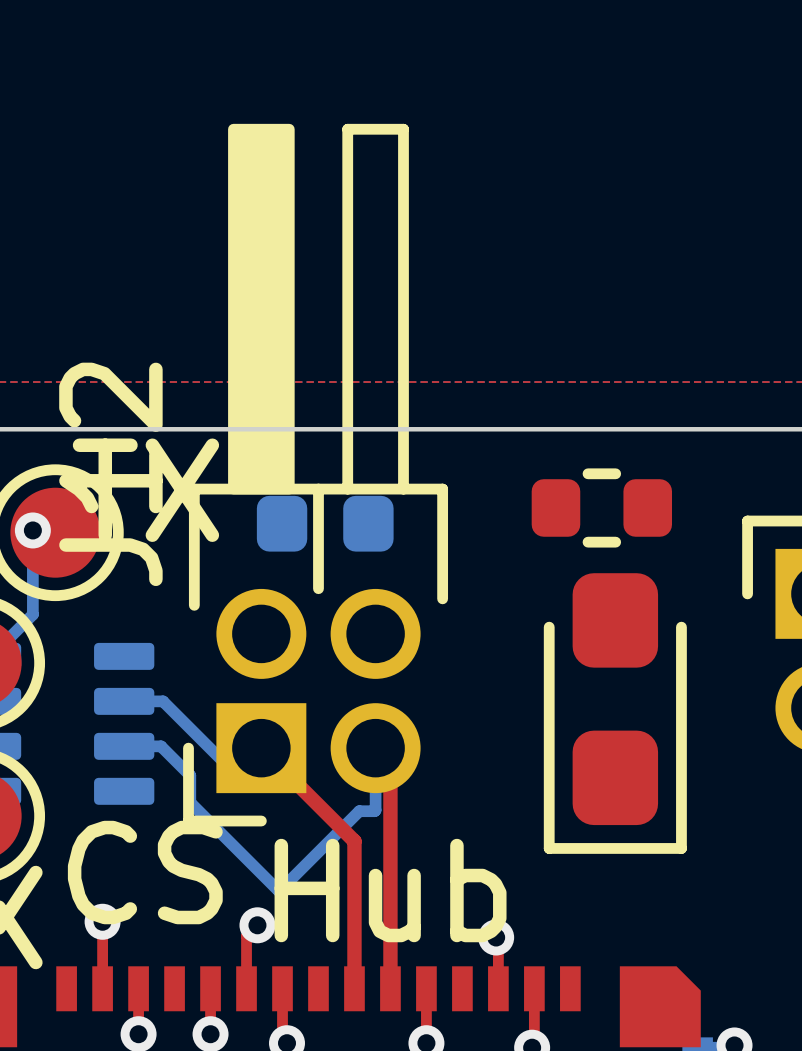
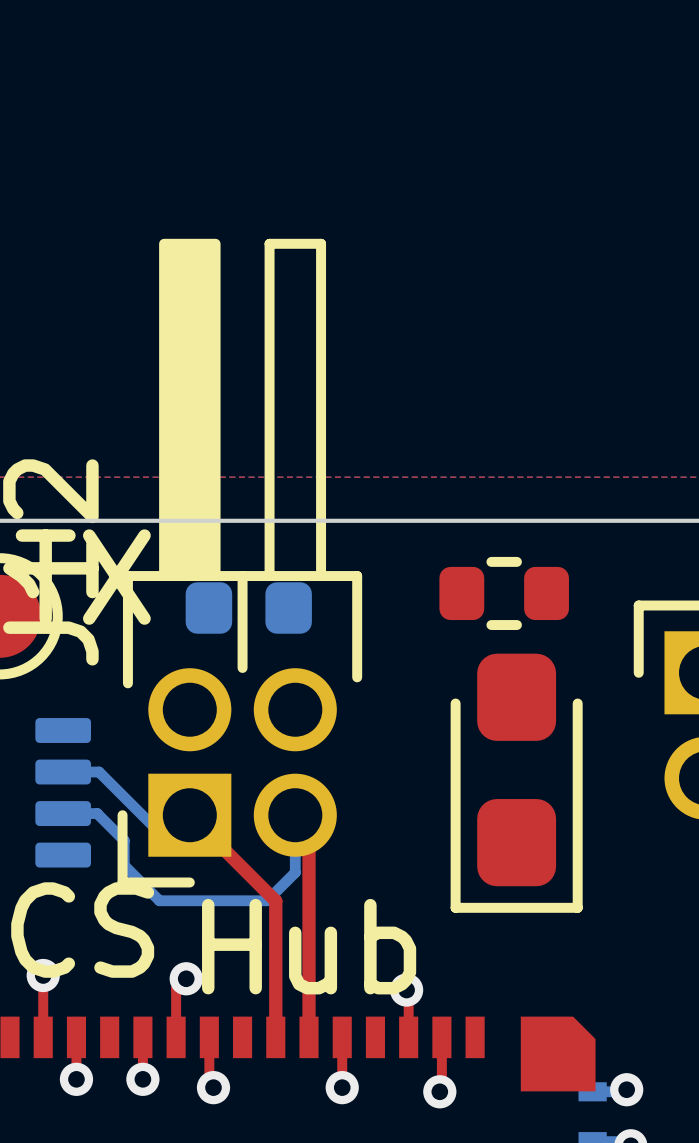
bottom track: (374, 811) (359, 811) (279, 891) (228, 840) -> (294, 873) (267, 900) (159, 900)

